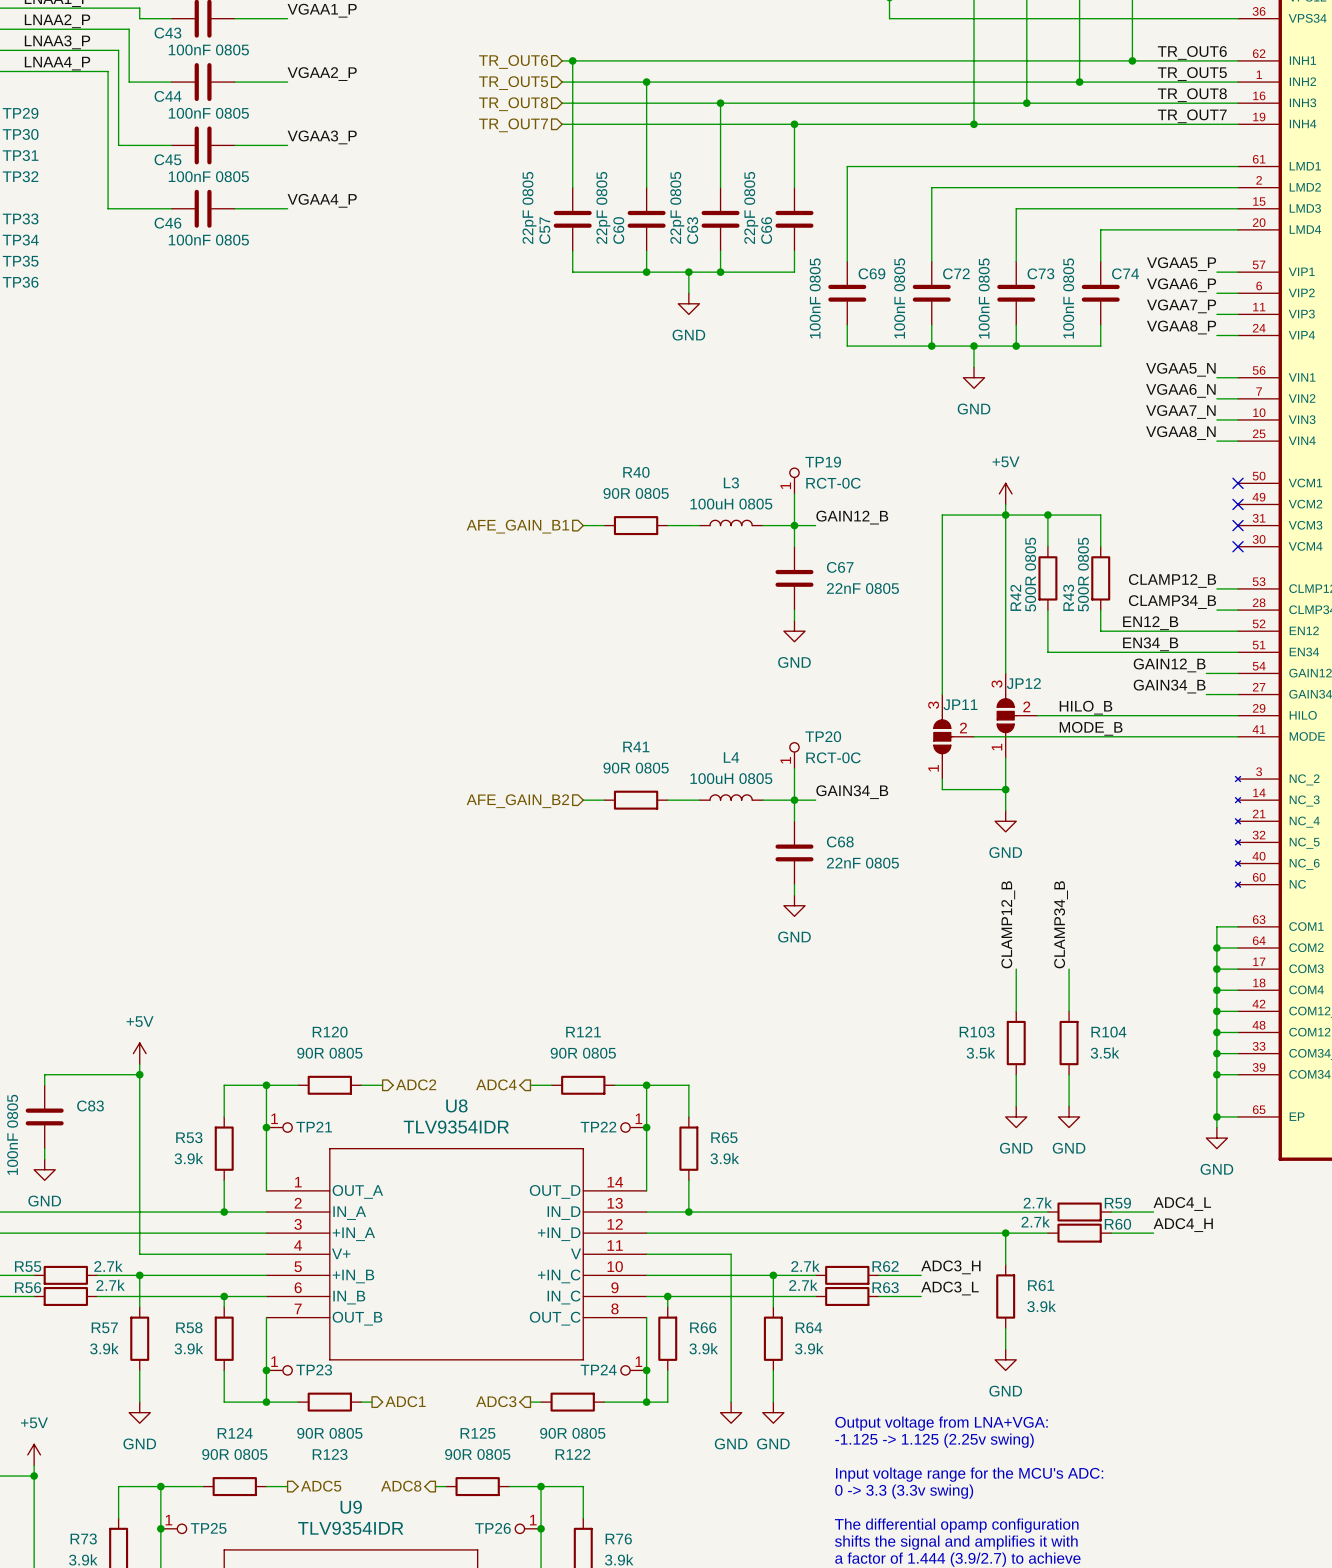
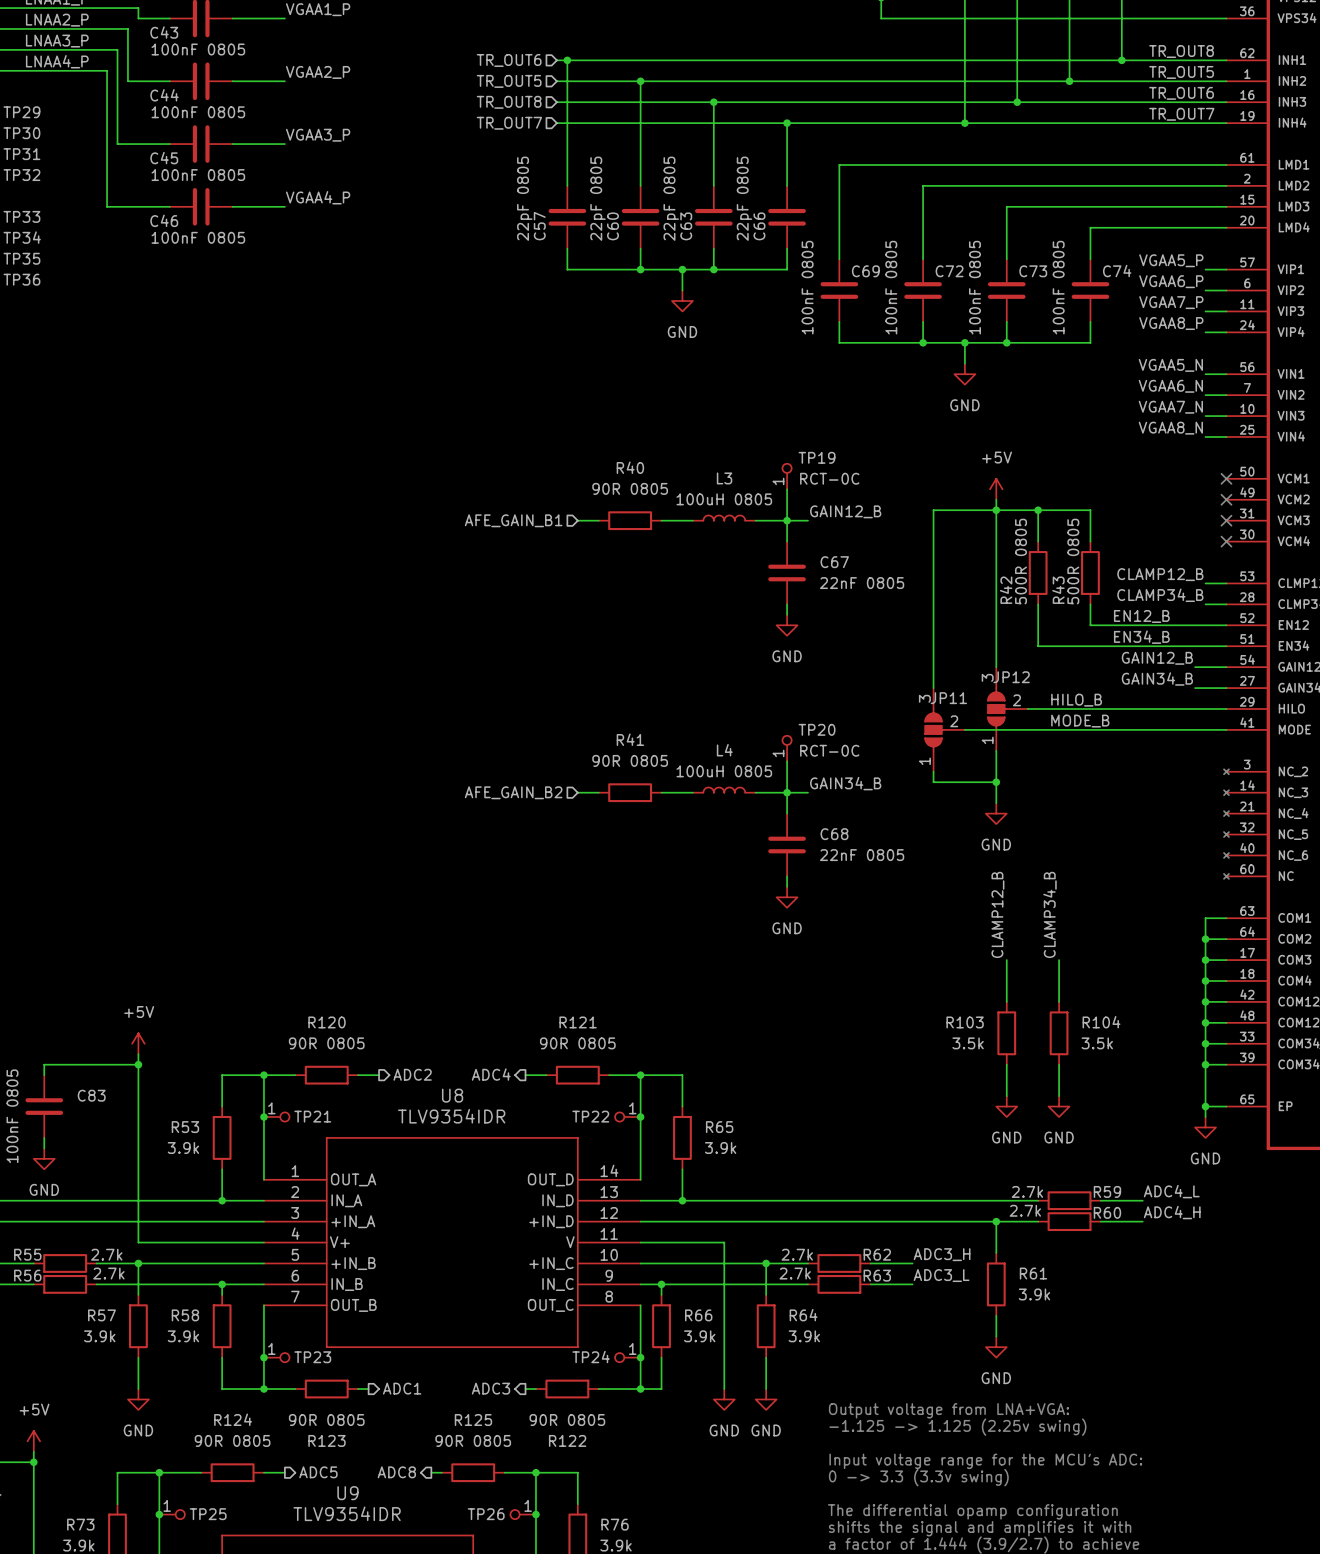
label: TR_OUT6 (1192, 52) -> TR_OUT8 (1181, 51)
label: TR_OUT8 (1192, 95) -> TR_OUT6 (1181, 93)

